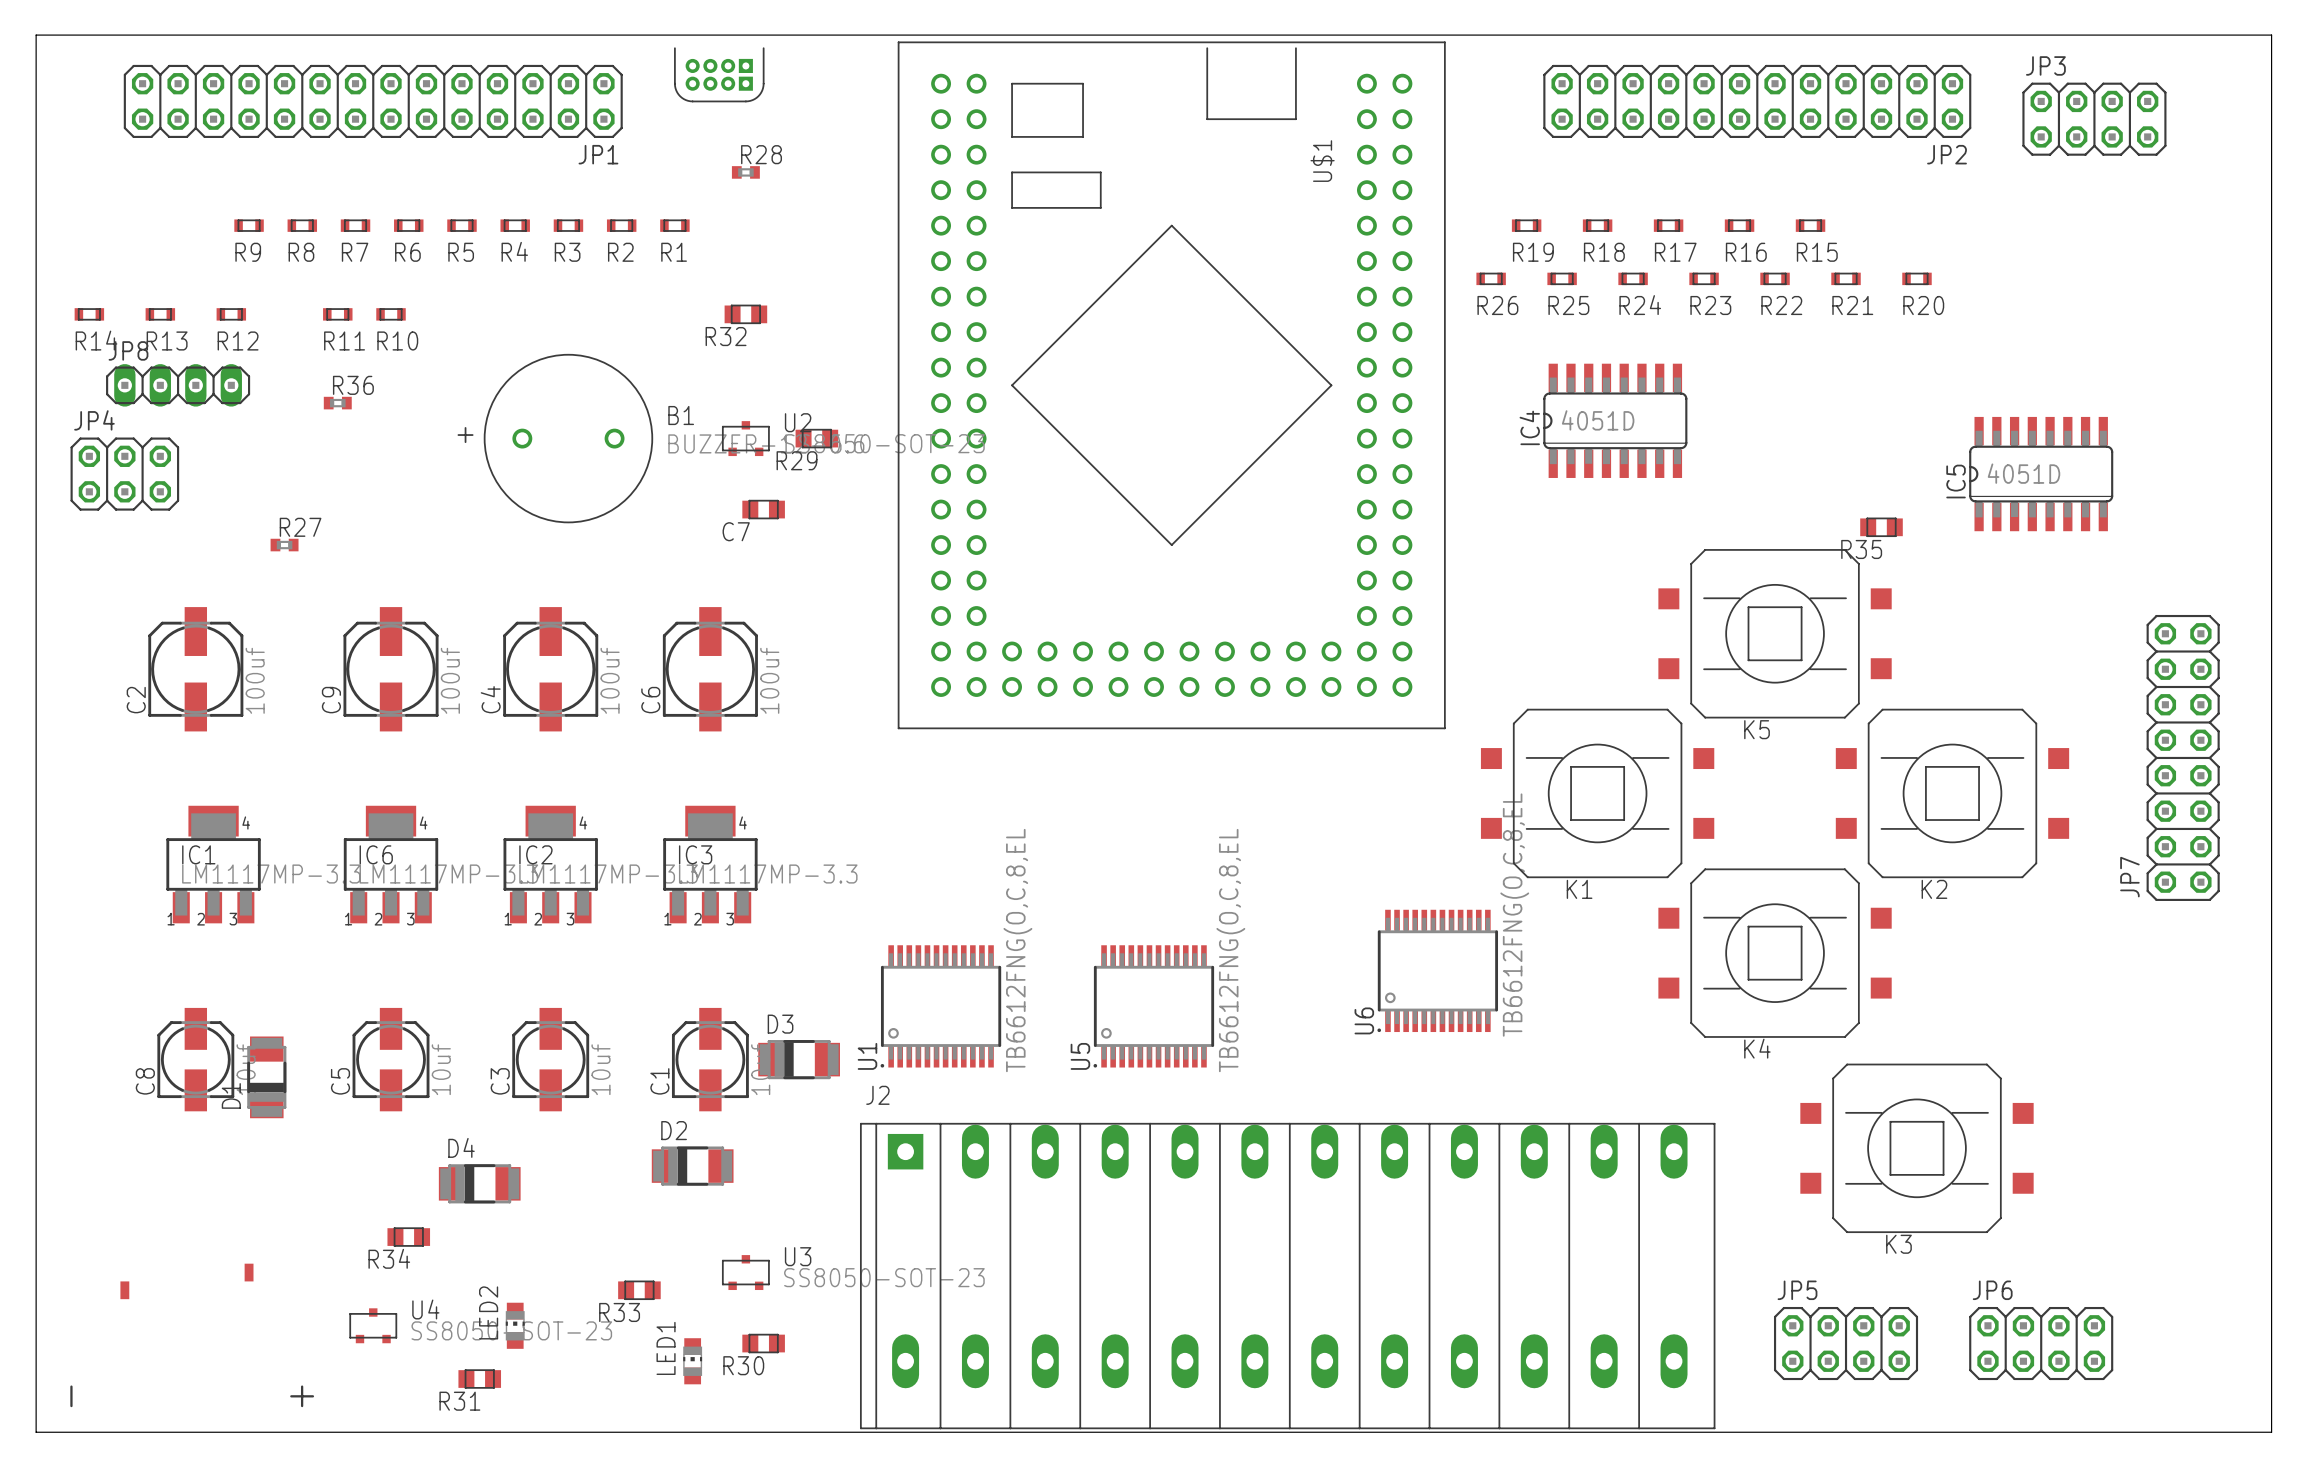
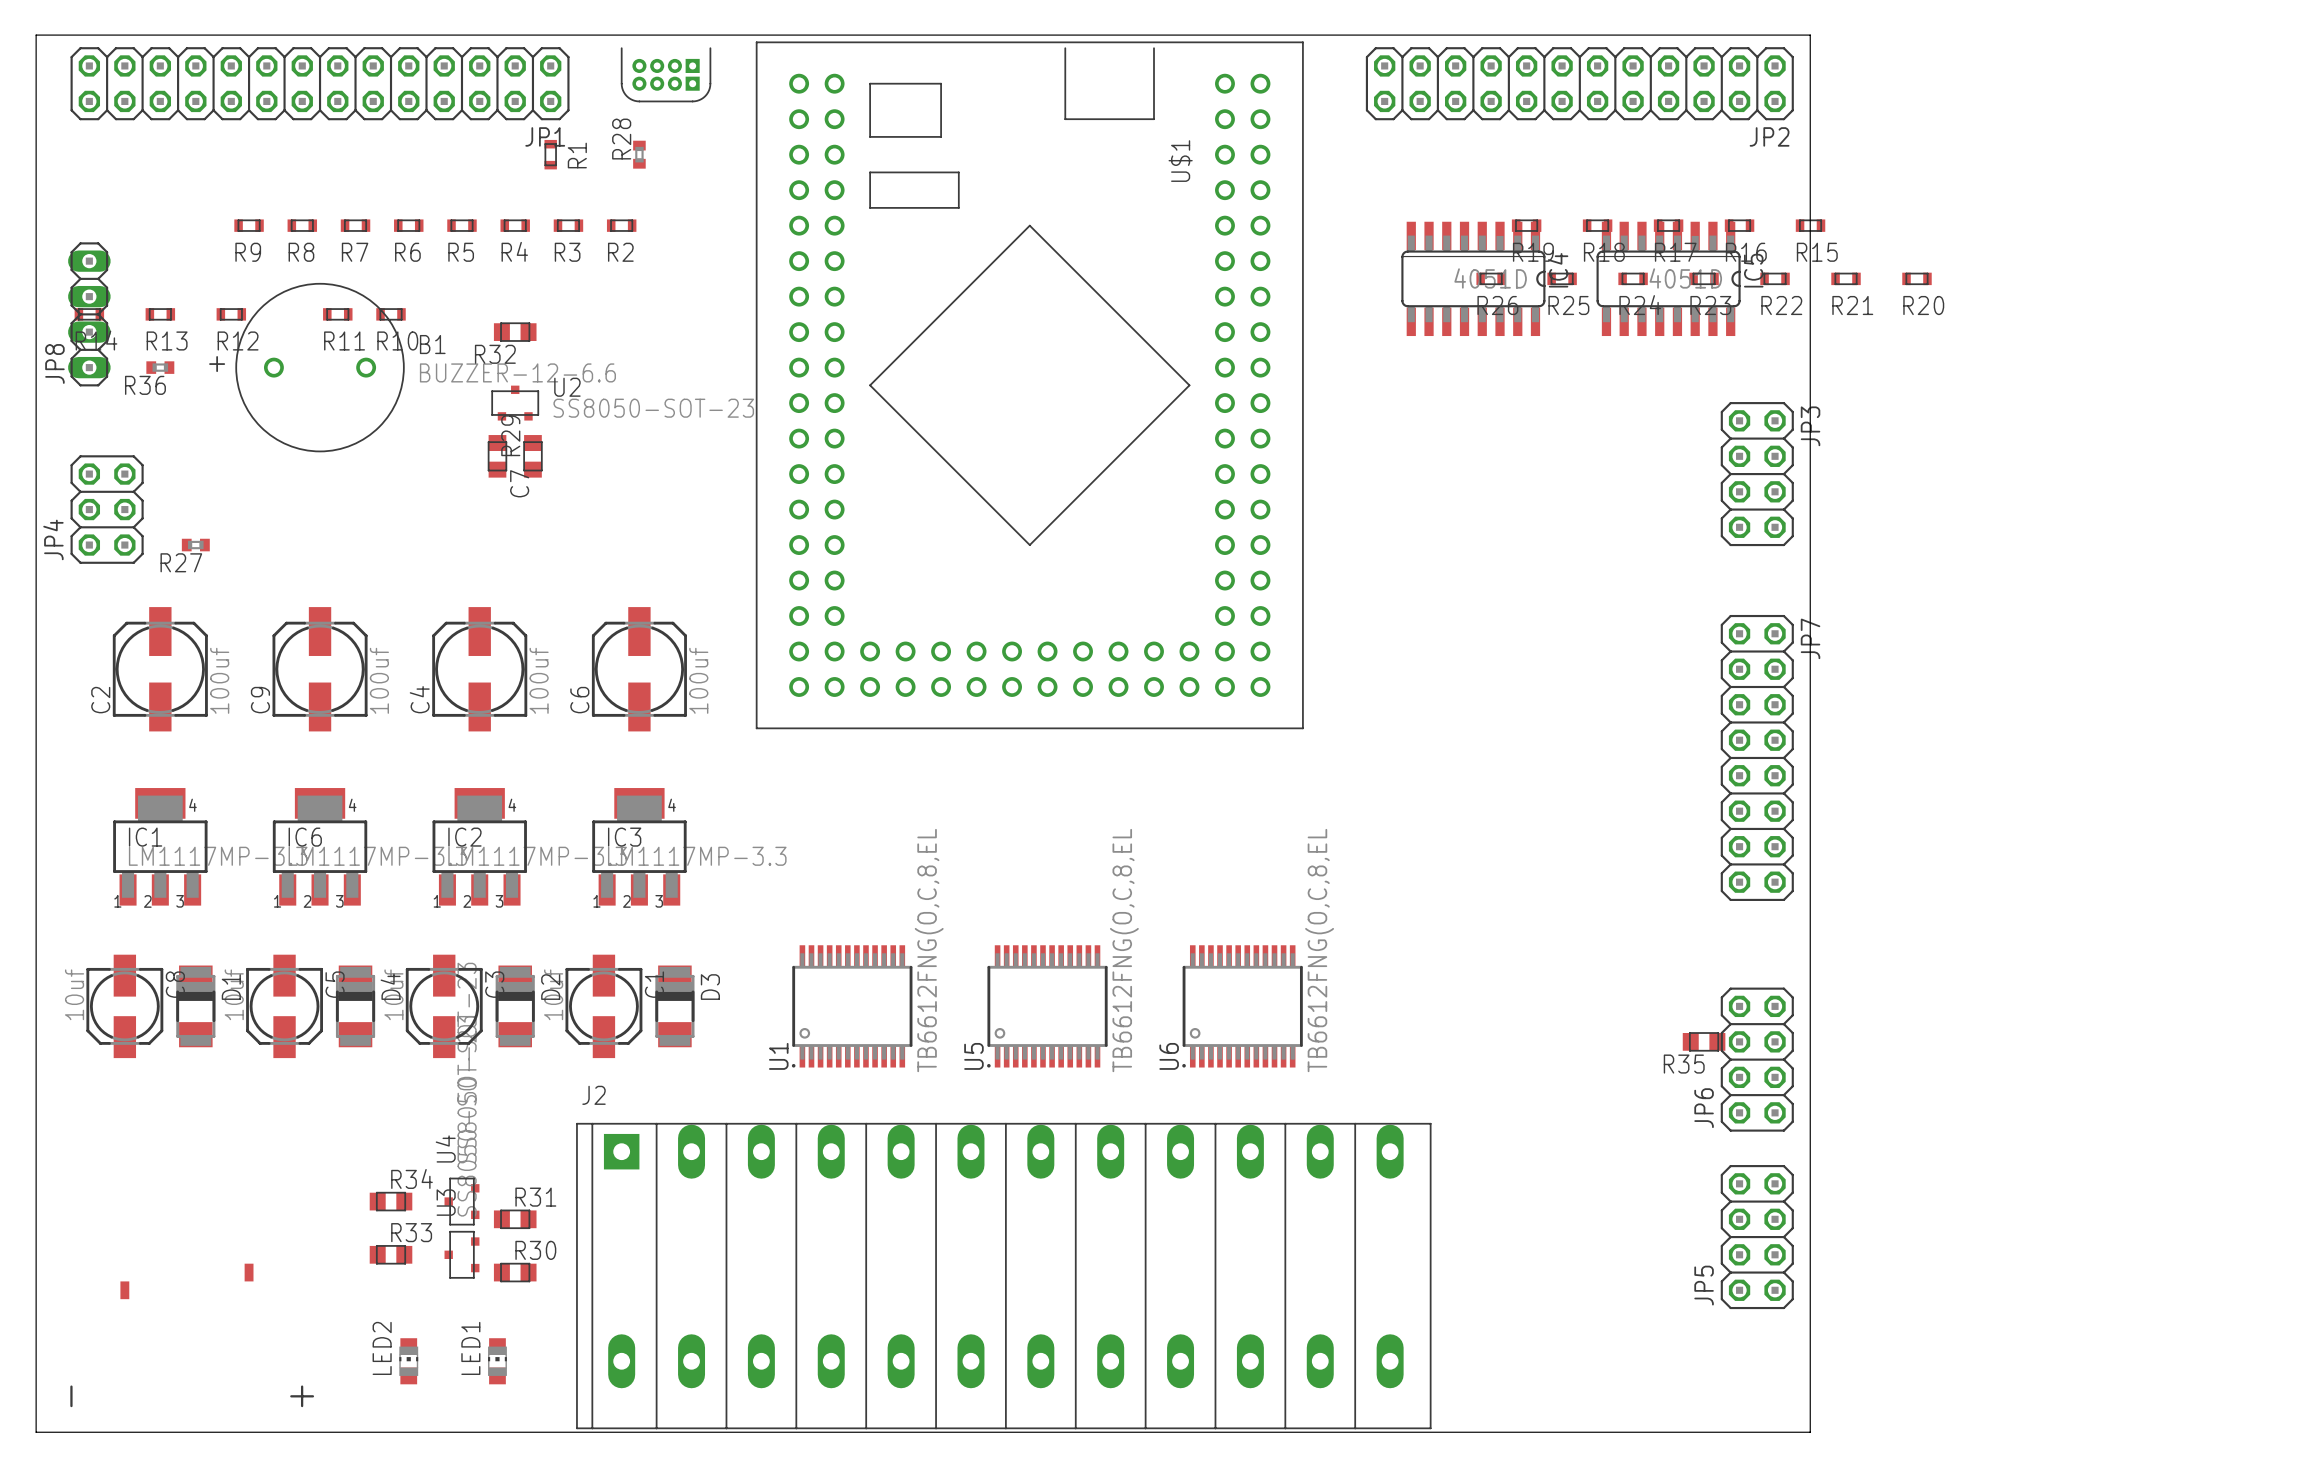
board edge: (1810, 35) (2271, 35) (2271, 1432) (1810, 1432) -> (1810, 35) (1810, 1432)
part position: (719, 74) -> (666, 74)
JP1 position: (373, 101) -> (320, 83)
JP2 position: (1757, 101) -> (1579, 83)
JP3 rotation: 0° (2094, 119) -> 90° clockwise (1757, 474)
JP3 position: (2094, 119) -> (1757, 474)
R28 name position: R28 (761, 154) -> R28 (621, 139)
R28 rotation: 0° (745, 172) -> 90° clockwise (639, 154)
R28 position: (745, 172) -> (639, 154)
R1 rotation: 0° (674, 225) -> 90° clockwise (550, 154)
R1 position: (674, 225) -> (550, 154)
R1 name position: R1 (674, 252) -> R1 (577, 155)
R32 position: (745, 314) -> (515, 332)
JP8 name position: JP8 (128, 350) -> JP8 (54, 363)
JP8 rotation: 0° (178, 385) -> 90° clockwise (89, 314)
JP8 position: (178, 385) -> (89, 314)
R36 name position: R36 (353, 385) -> R36 (145, 385)
U$1 position: (1171, 385) -> (1029, 385)
R36 position: (337, 403) -> (160, 367)
JP4 name position: JP4 (94, 420) -> JP4 (53, 539)
IC4 rotation: 0° (1615, 420) -> 180° (1473, 278)
IC4 position: (1615, 420) -> (1473, 278)
B1 position: (555, 438) -> (306, 367)
U2 position: (745, 438) -> (515, 403)
R29 rotation: 0° (816, 438) -> 90° clockwise (532, 456)
R29 position: (816, 438) -> (532, 456)
JP4 rotation: 0° (124, 474) -> 90° clockwise (107, 509)
IC5 rotation: 0° (2041, 474) -> 180° (1668, 278)
IC5 position: (2041, 474) -> (1668, 278)
C7 rotation: 0° (763, 509) -> 90° clockwise (497, 456)
C7 position: (763, 509) -> (497, 456)
R27 name position: R27 (300, 527) -> R27 (181, 562)
R35 position: (1881, 527) -> (1704, 1041)
C7 name position: C7 (736, 531) -> C7 (519, 483)
R27 position: (284, 545) -> (195, 545)
K5: (1775, 633) -> none
C2 position: (195, 669) -> (160, 669)
C9 position: (391, 669) -> (320, 669)
C4 position: (550, 669) -> (479, 669)
C6 position: (710, 669) -> (639, 669)
JP7 position: (2183, 757) -> (1757, 757)
K1: (1597, 793) -> none
K2: (1952, 793) -> none
IC1 position: (213, 864) -> (160, 846)
IC6 position: (391, 864) -> (320, 846)
IC2 position: (550, 864) -> (479, 846)
IC3 position: (710, 864) -> (639, 846)
JP7 name position: JP7 (2129, 877) -> JP7 (1810, 638)
K4: (1775, 953) -> none
U6 position: (1437, 970) -> (1242, 1006)
U1 position: (940, 1006) -> (852, 1006)
U5 position: (1153, 1006) -> (1047, 1006)
C8 rotation: 0° (195, 1059) -> 180° (124, 1006)
C8 position: (195, 1059) -> (124, 1006)
C5 rotation: 0° (391, 1059) -> 180° (284, 1006)
C5 position: (391, 1059) -> (284, 1006)
C3 rotation: 0° (550, 1059) -> 180° (444, 1006)
C3 position: (550, 1059) -> (444, 1006)
C1 rotation: 0° (710, 1059) -> 180° (603, 1006)
C1 position: (710, 1059) -> (603, 1006)
D3 rotation: 0° (799, 1059) -> 90° clockwise (674, 1006)
D3 position: (799, 1059) -> (674, 1006)
D1 rotation: 0° (266, 1077) -> 180° (195, 1006)
D1 position: (266, 1077) -> (195, 1006)
K3: (1916, 1148) -> none
D2 rotation: 0° (692, 1166) -> 90° clockwise (515, 1006)
D2 position: (692, 1166) -> (515, 1006)
D4 rotation: 0° (479, 1183) -> 90° clockwise (355, 1006)
D4 position: (479, 1183) -> (355, 1006)
R34 position: (408, 1237) -> (391, 1201)
R34 name position: R34 (389, 1258) -> R34 (412, 1178)
U3 rotation: 0° (745, 1272) -> 90° counterclockwise (461, 1254)
U3 position: (745, 1272) -> (461, 1254)
J2 position: (1287, 1276) -> (1003, 1276)
R33 position: (639, 1290) -> (391, 1254)
JP5 name position: JP5 (1797, 1290) -> JP5 (1704, 1285)
JP6 name position: JP6 (1992, 1290) -> JP6 (1704, 1108)
R33 name position: R33 (619, 1312) -> R33 (411, 1232)
U4 rotation: 0° (373, 1325) -> 90° counterclockwise (461, 1201)
U4 position: (373, 1325) -> (461, 1201)
LED2 position: (515, 1325) -> (408, 1361)
R30 position: (763, 1343) -> (515, 1272)
JP5 rotation: 0° (1846, 1343) -> 90° clockwise (1757, 1237)
JP5 position: (1846, 1343) -> (1757, 1237)
JP6 rotation: 0° (2041, 1343) -> 90° clockwise (1757, 1059)
JP6 position: (2041, 1343) -> (1757, 1059)
LED1 position: (692, 1361) -> (497, 1361)
R30 name position: R30 (743, 1365) -> R30 (535, 1250)
R31 position: (479, 1379) -> (515, 1219)
R31 name position: R31 (459, 1401) -> R31 (535, 1197)

